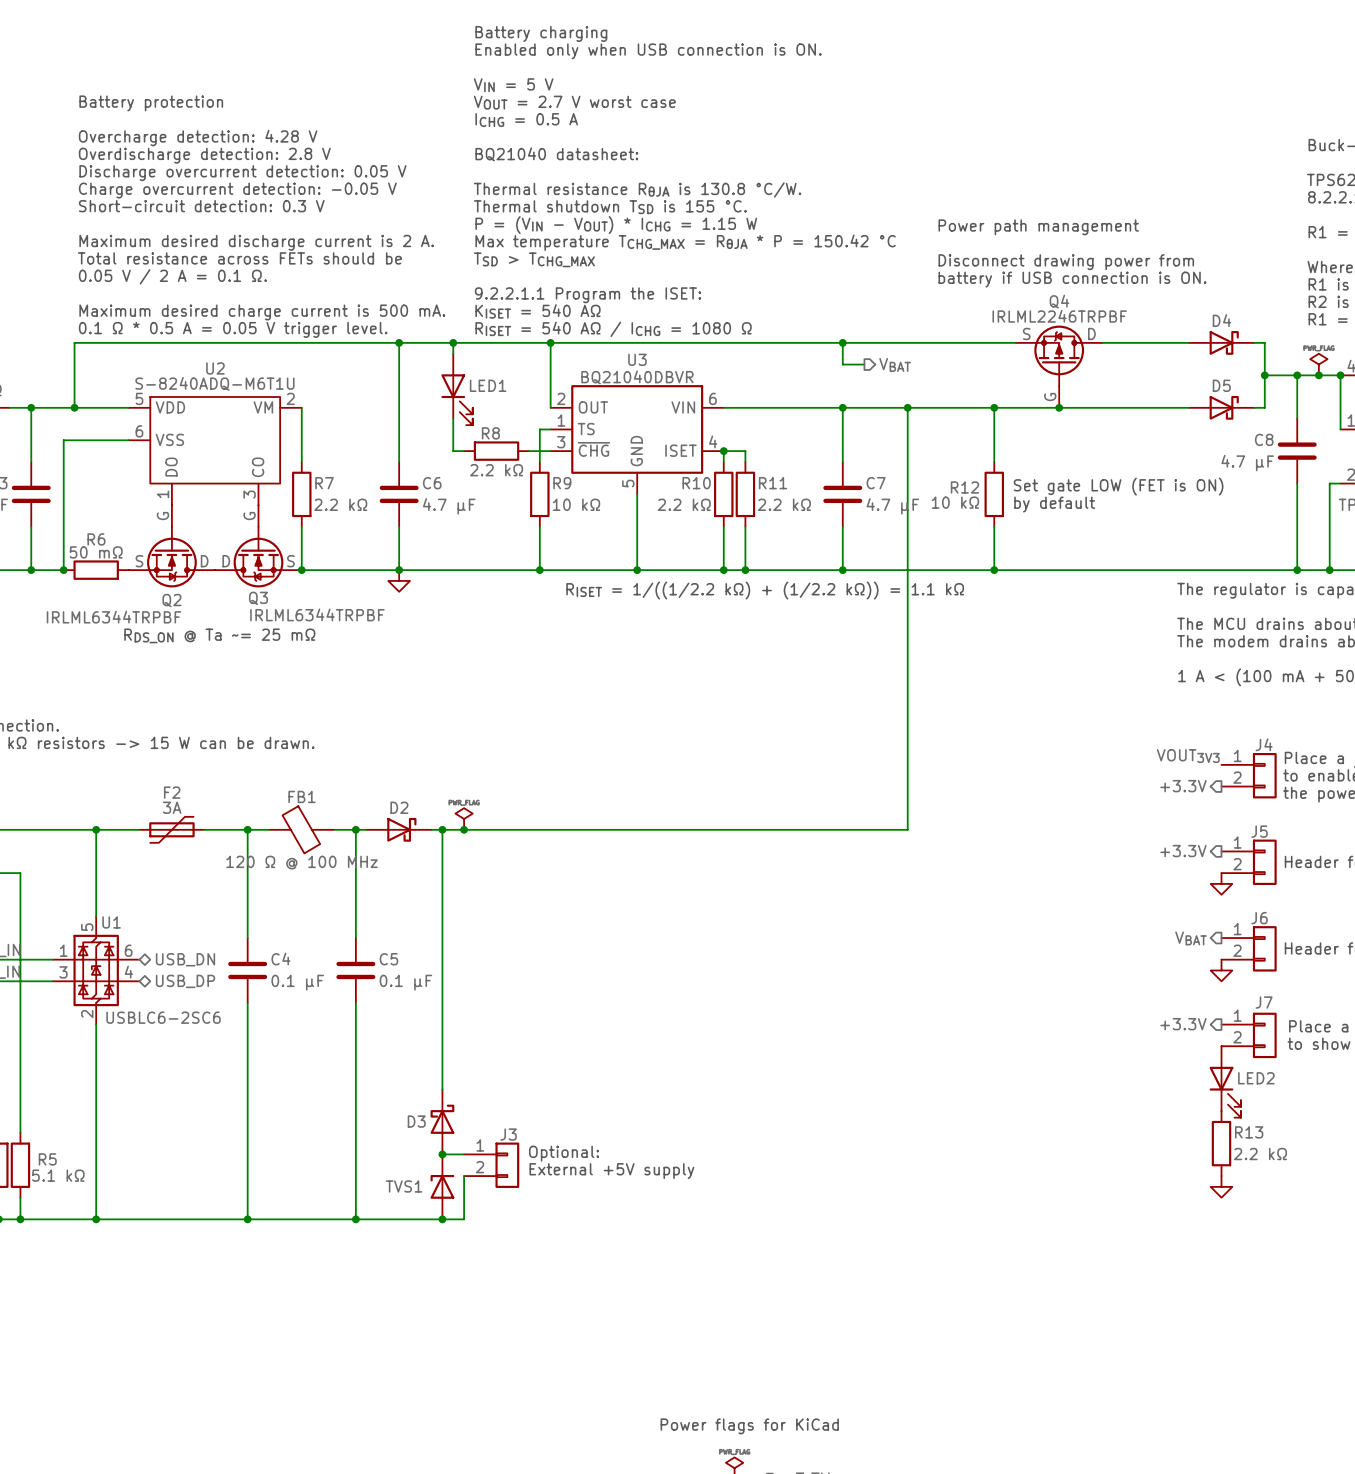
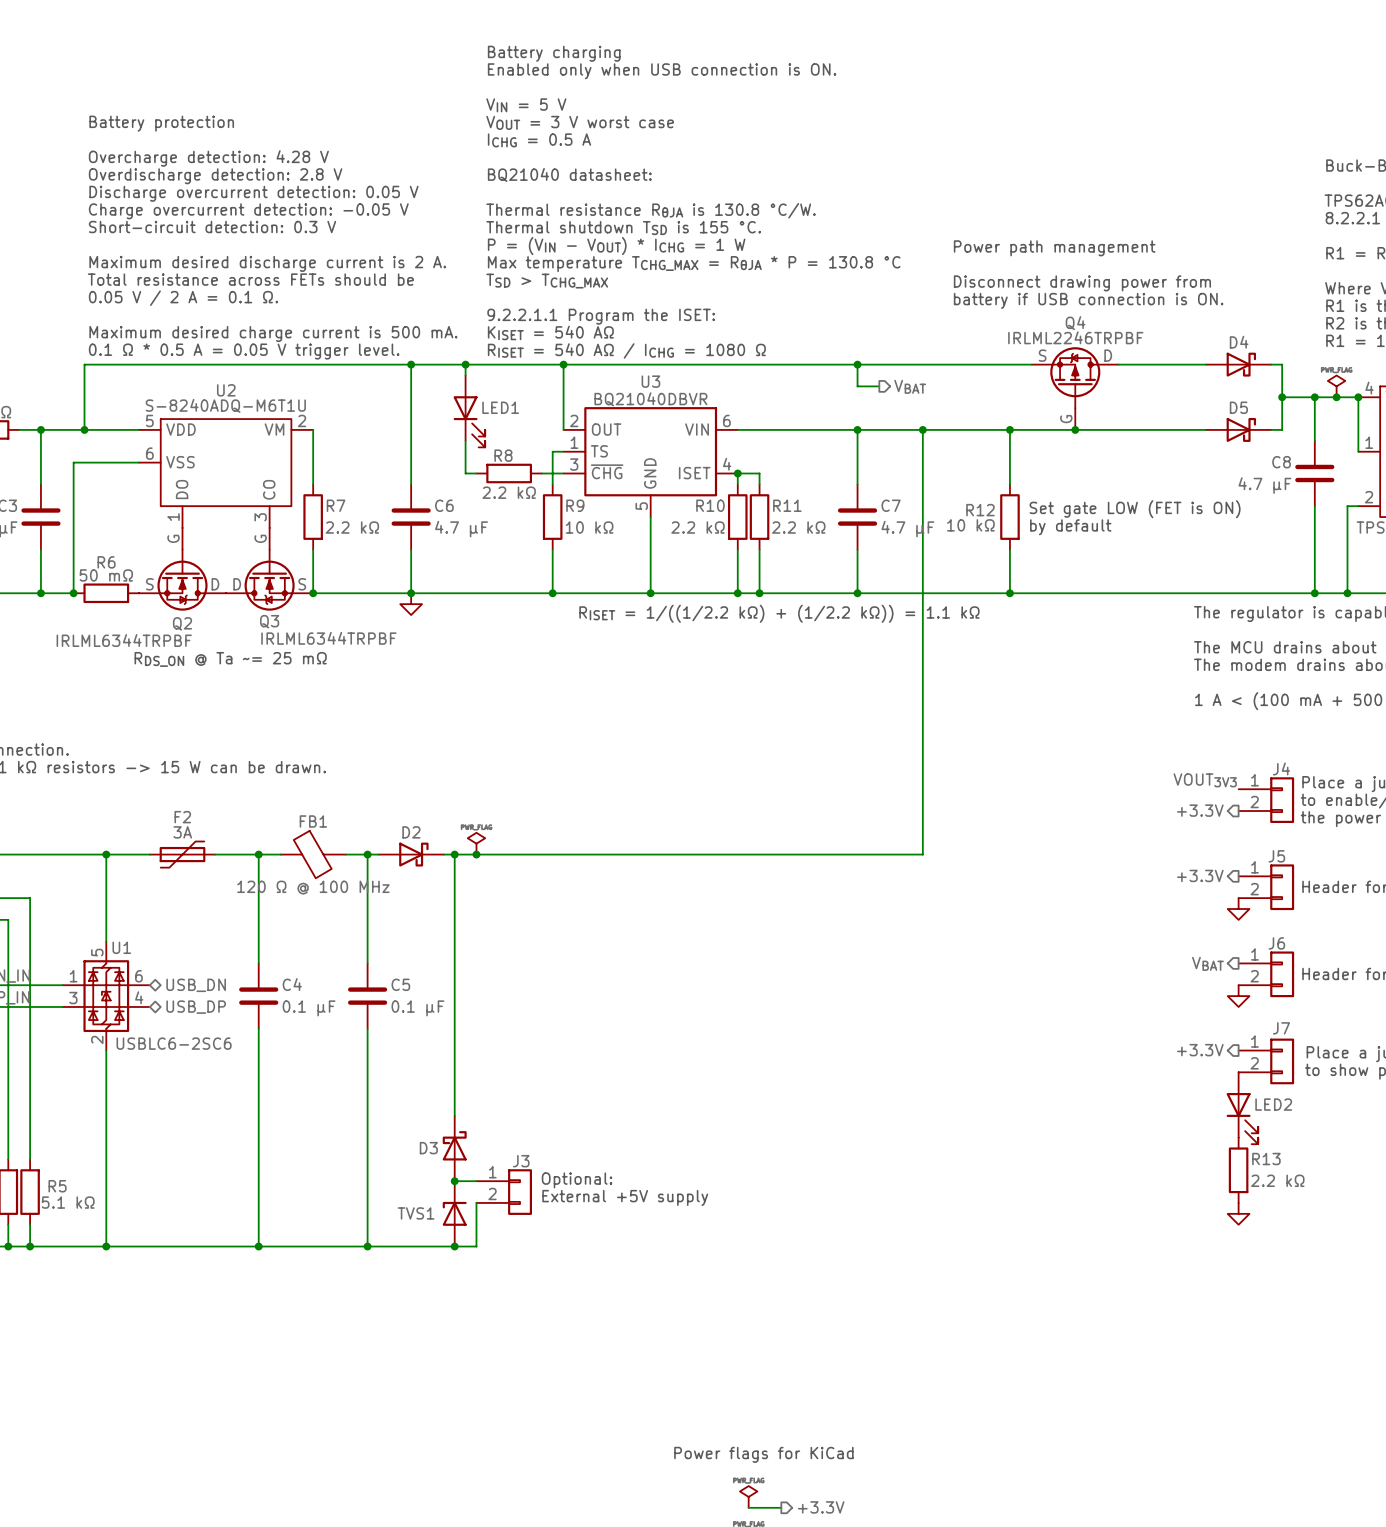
text: VOUT = 2.7 V worst case (574, 102) -> VOUT = 3 V worst case (580, 122)
text: P = (VIN - VOUT) * ICHG = 1.15 W (616, 225) -> P = (VIN - VOUT) * ICHG = 1 W (616, 246)
text: Max temperature TCHG_MAX = RθJA * P = 150.42 °C (685, 242) -> Max temperature TCHG_MAX = RθJA * P = 130.8 °C (694, 264)

